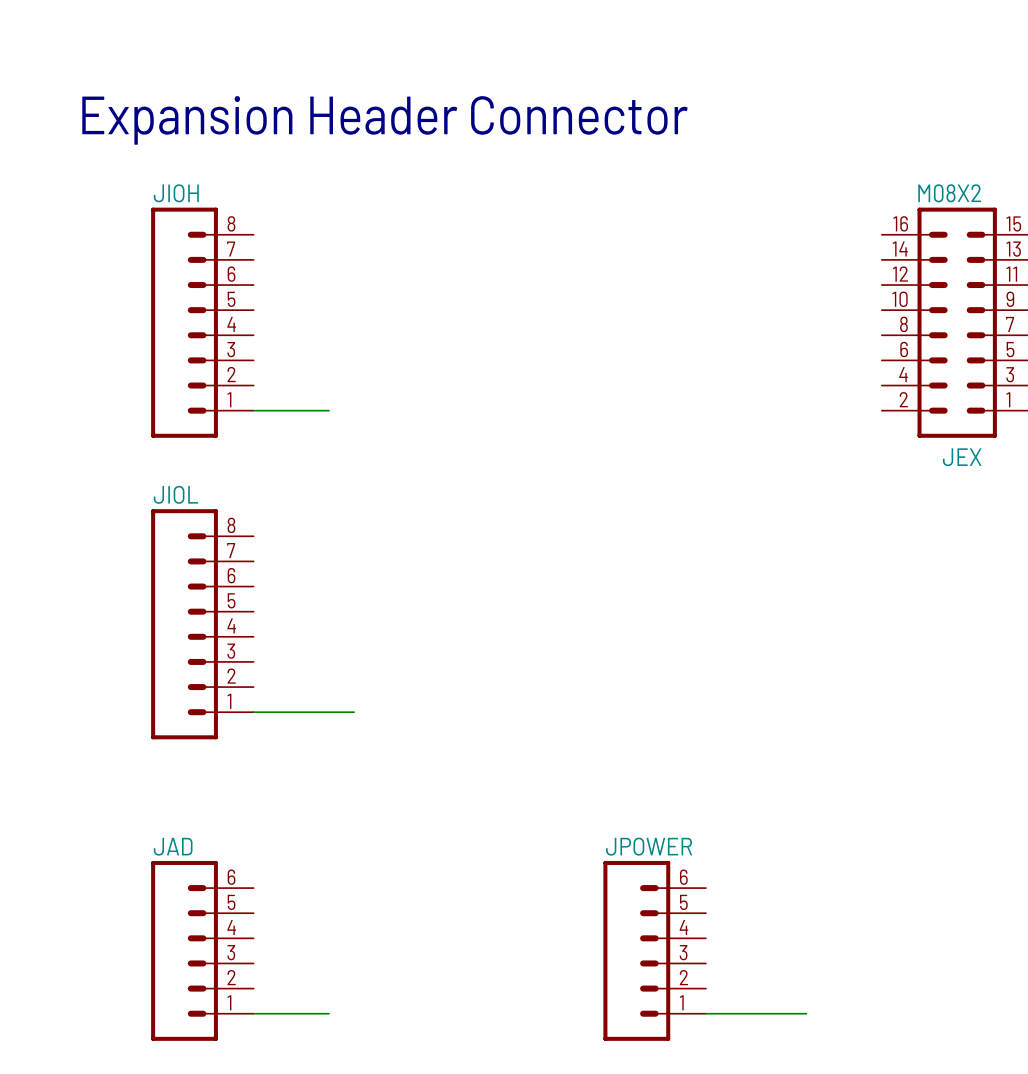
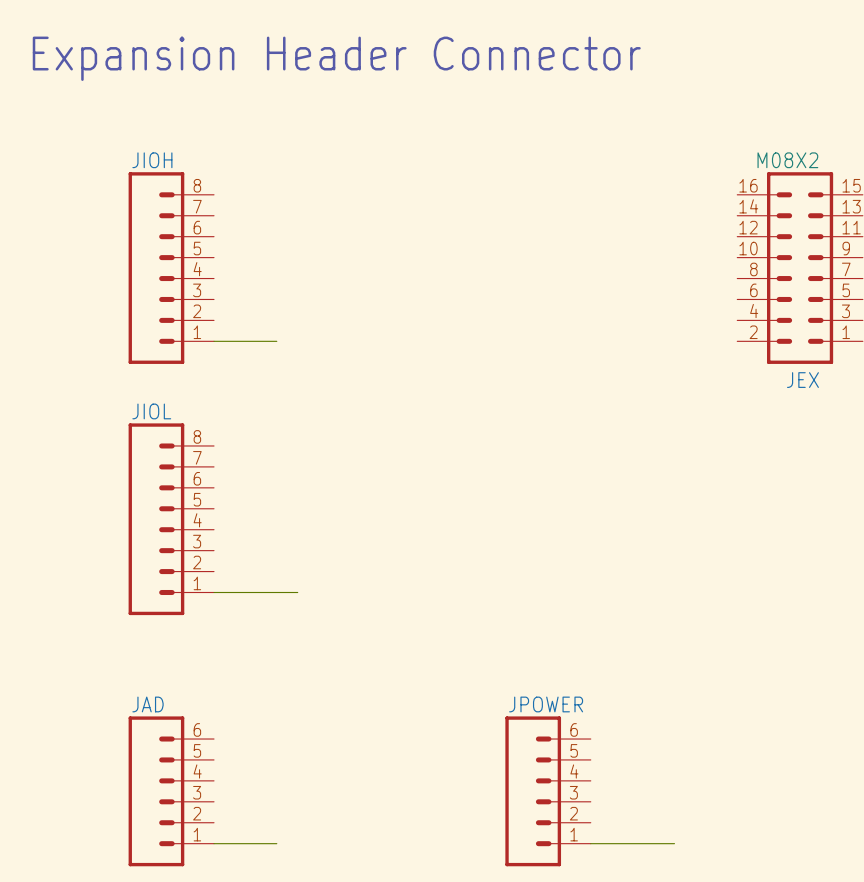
text position: Expansion Header Connector (384, 120) -> Expansion Header Connector (336, 58)

